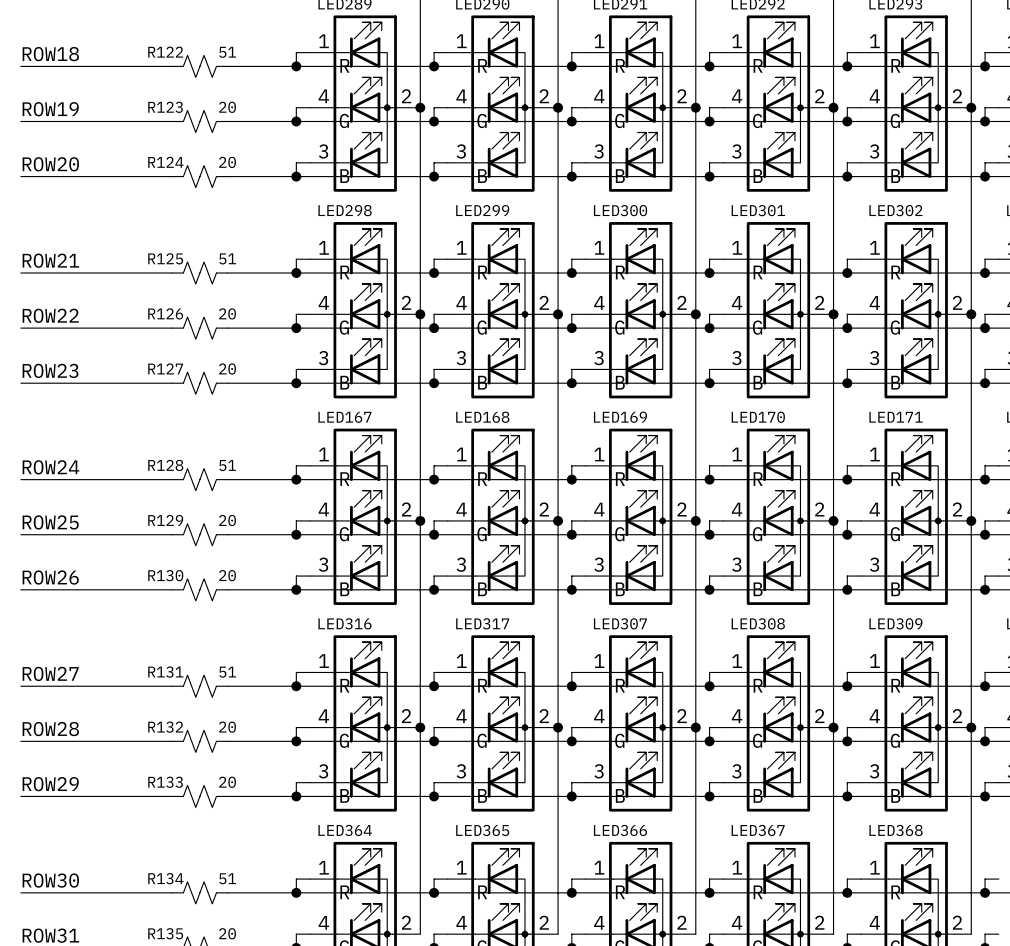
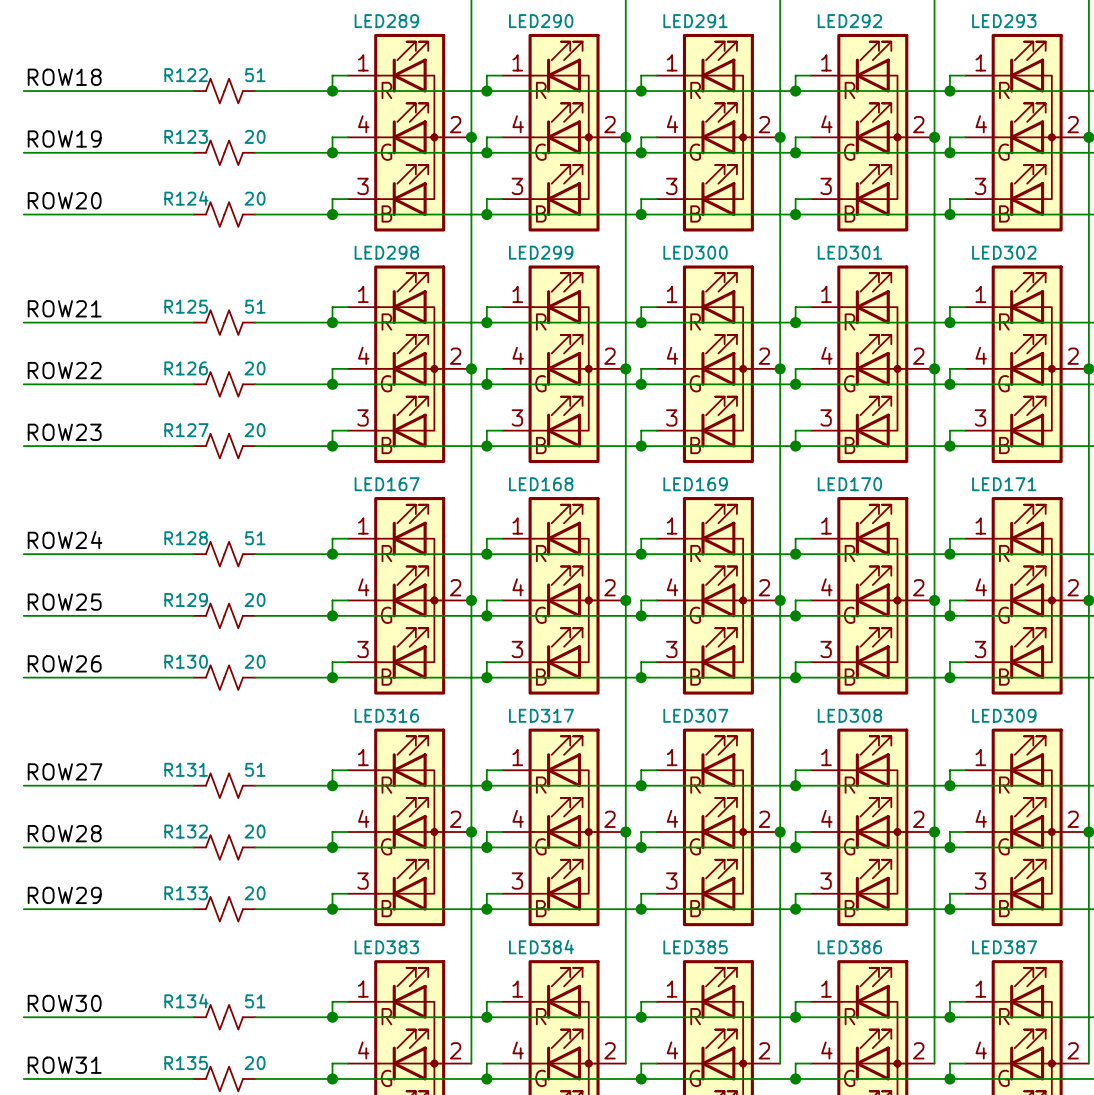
LED364 name: LED364 (345, 830) -> LED383 (386, 947)
LED365 name: LED365 (482, 830) -> LED384 (541, 947)
LED366 name: LED366 (620, 830) -> LED385 (695, 947)
LED367 name: LED367 (758, 830) -> LED386 (849, 947)
LED368 name: LED368 (896, 830) -> LED387 (1004, 947)

